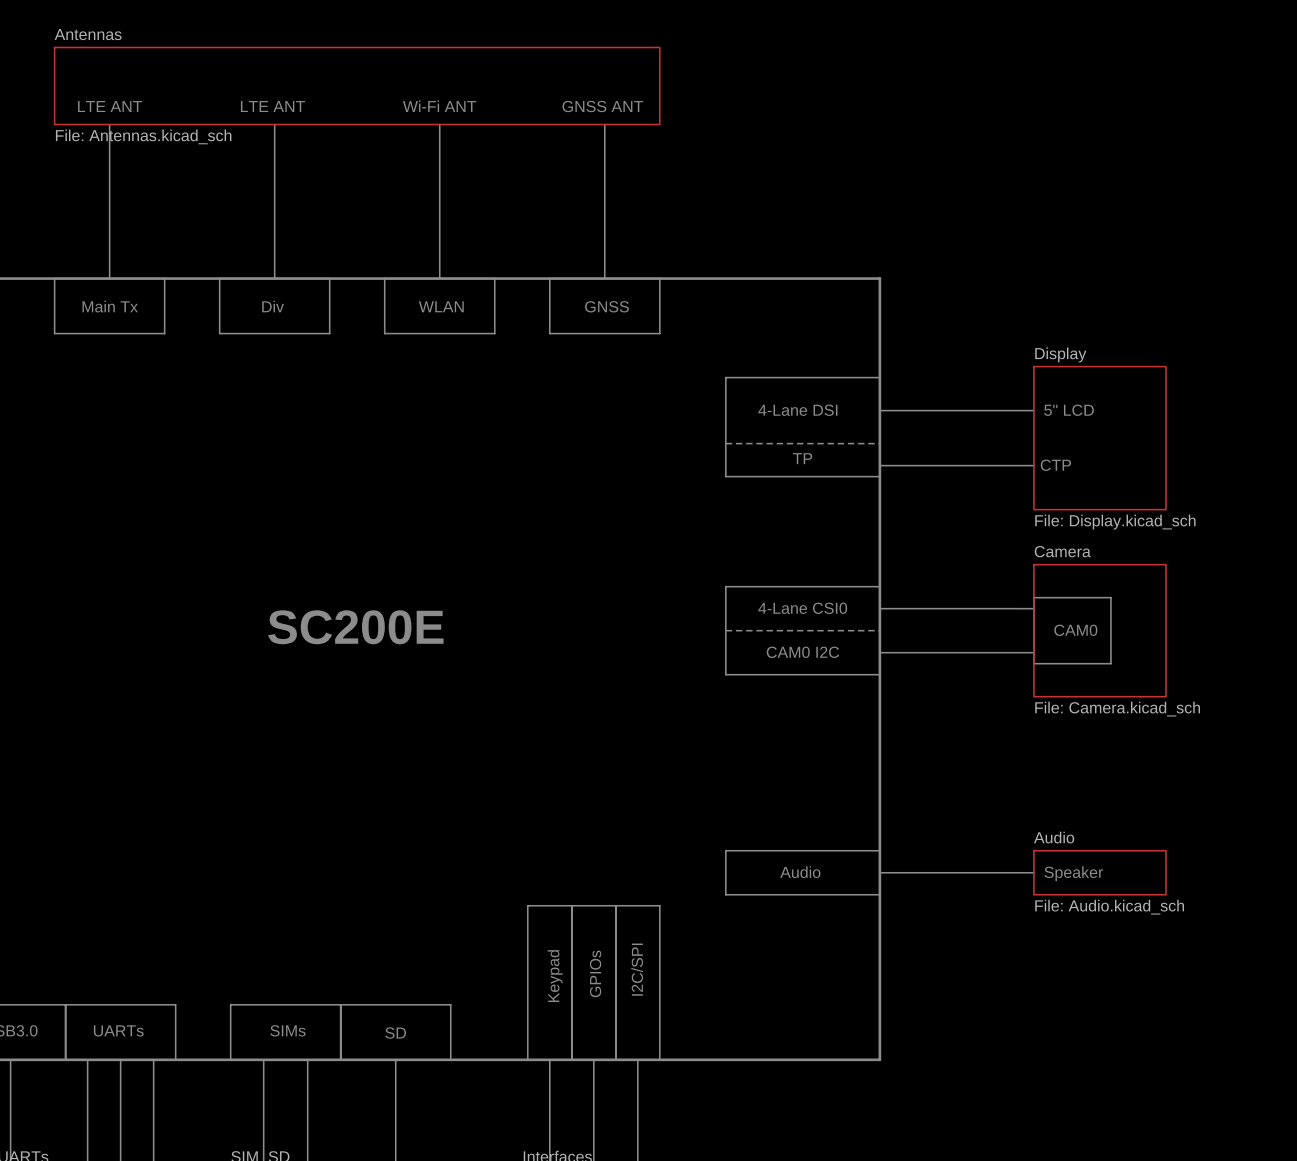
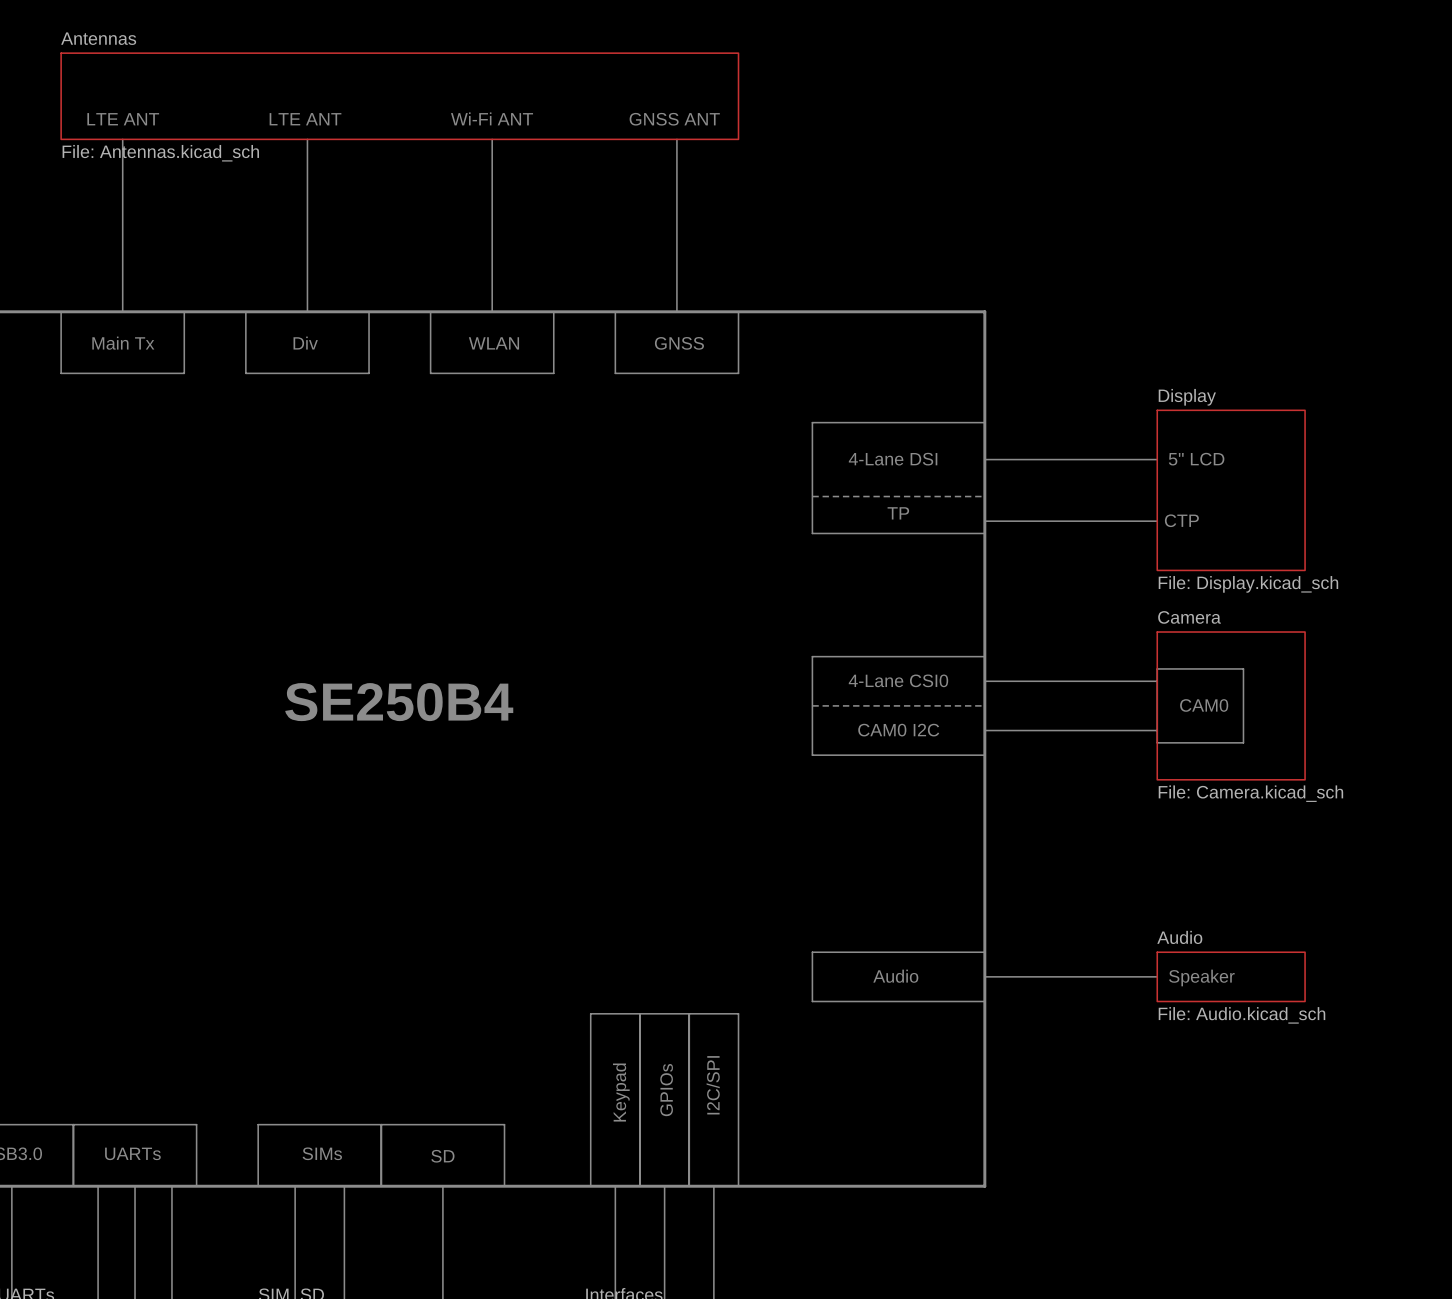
text: SC200E (355, 627) -> SE250B4 (399, 702)

